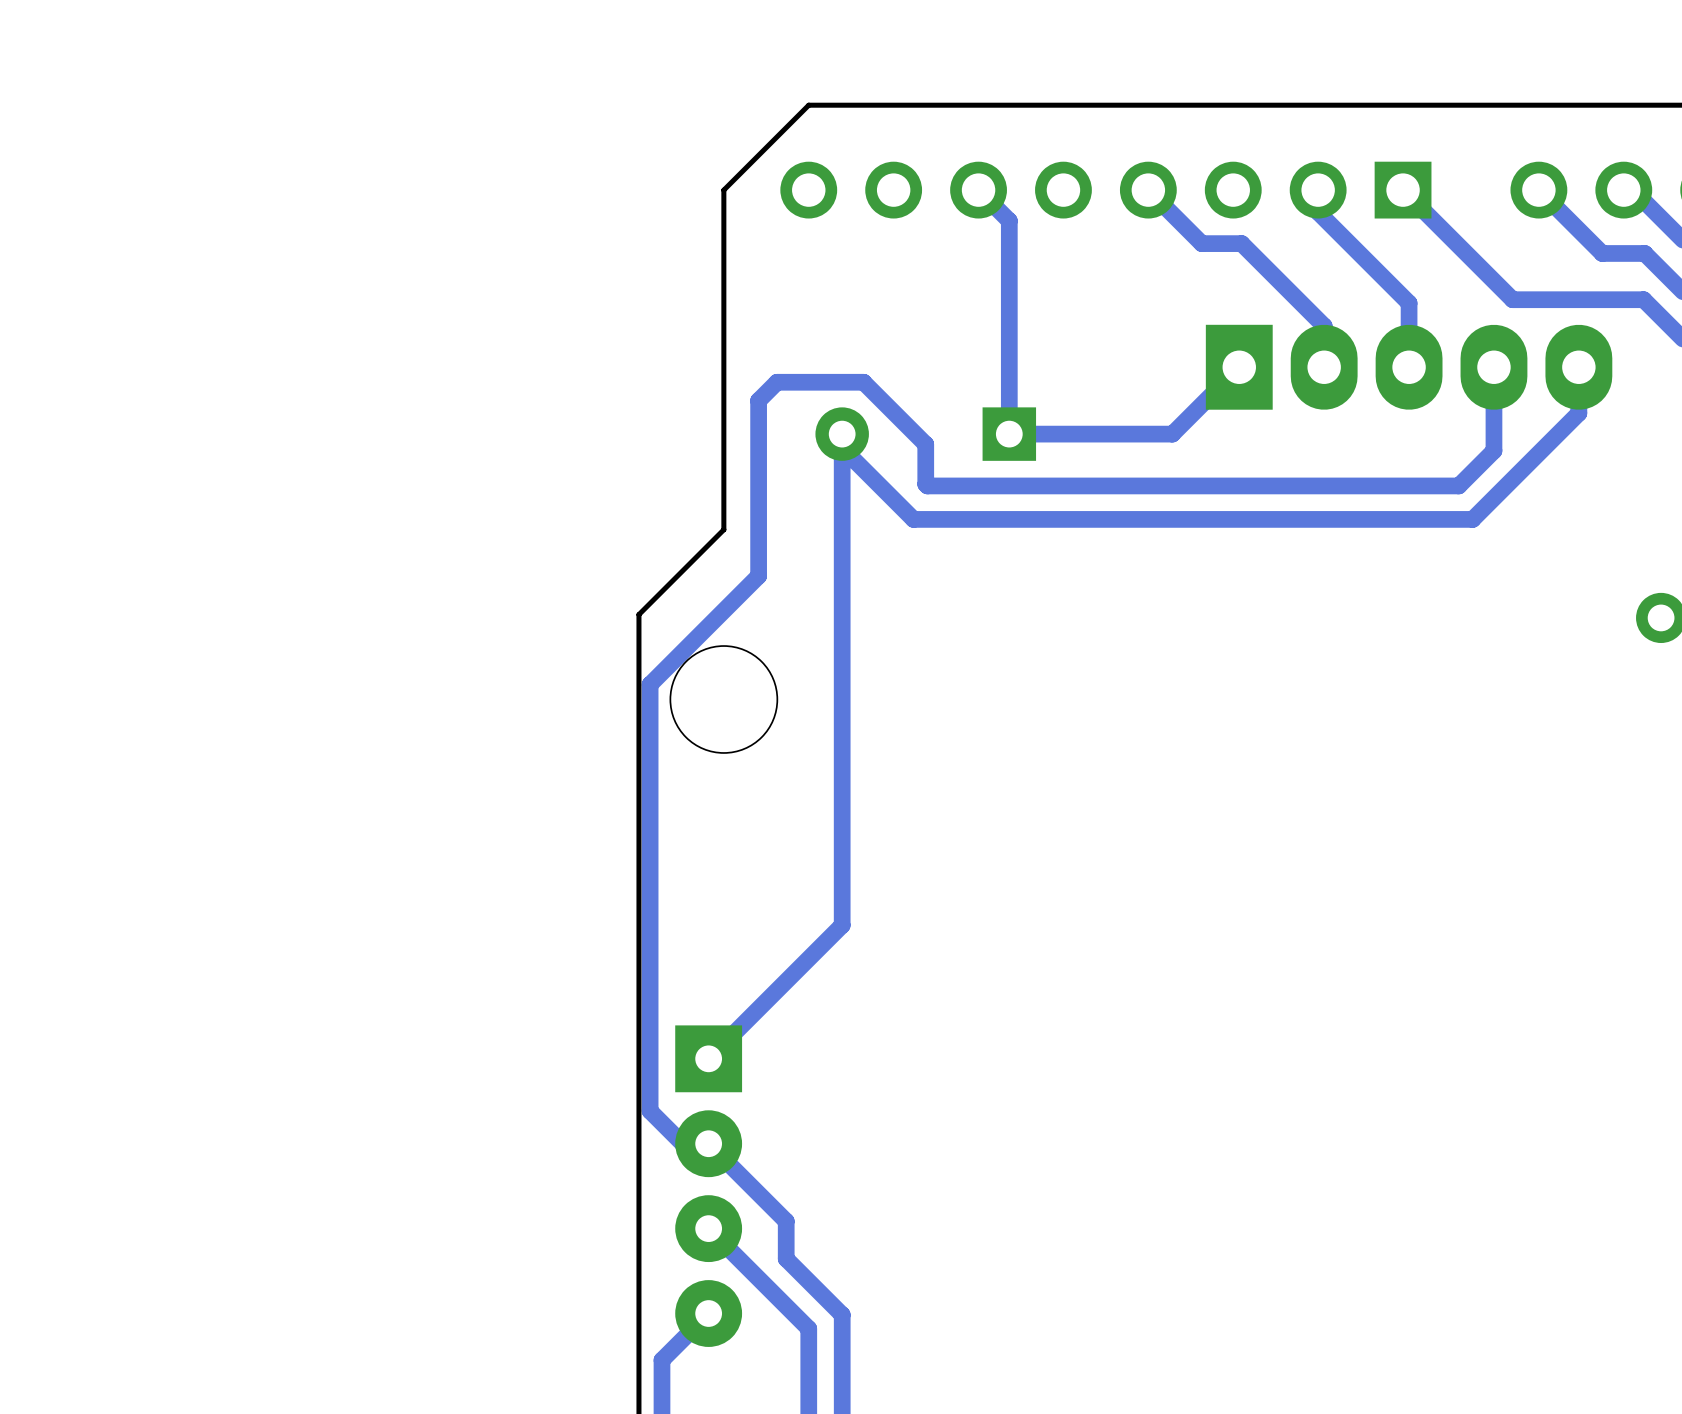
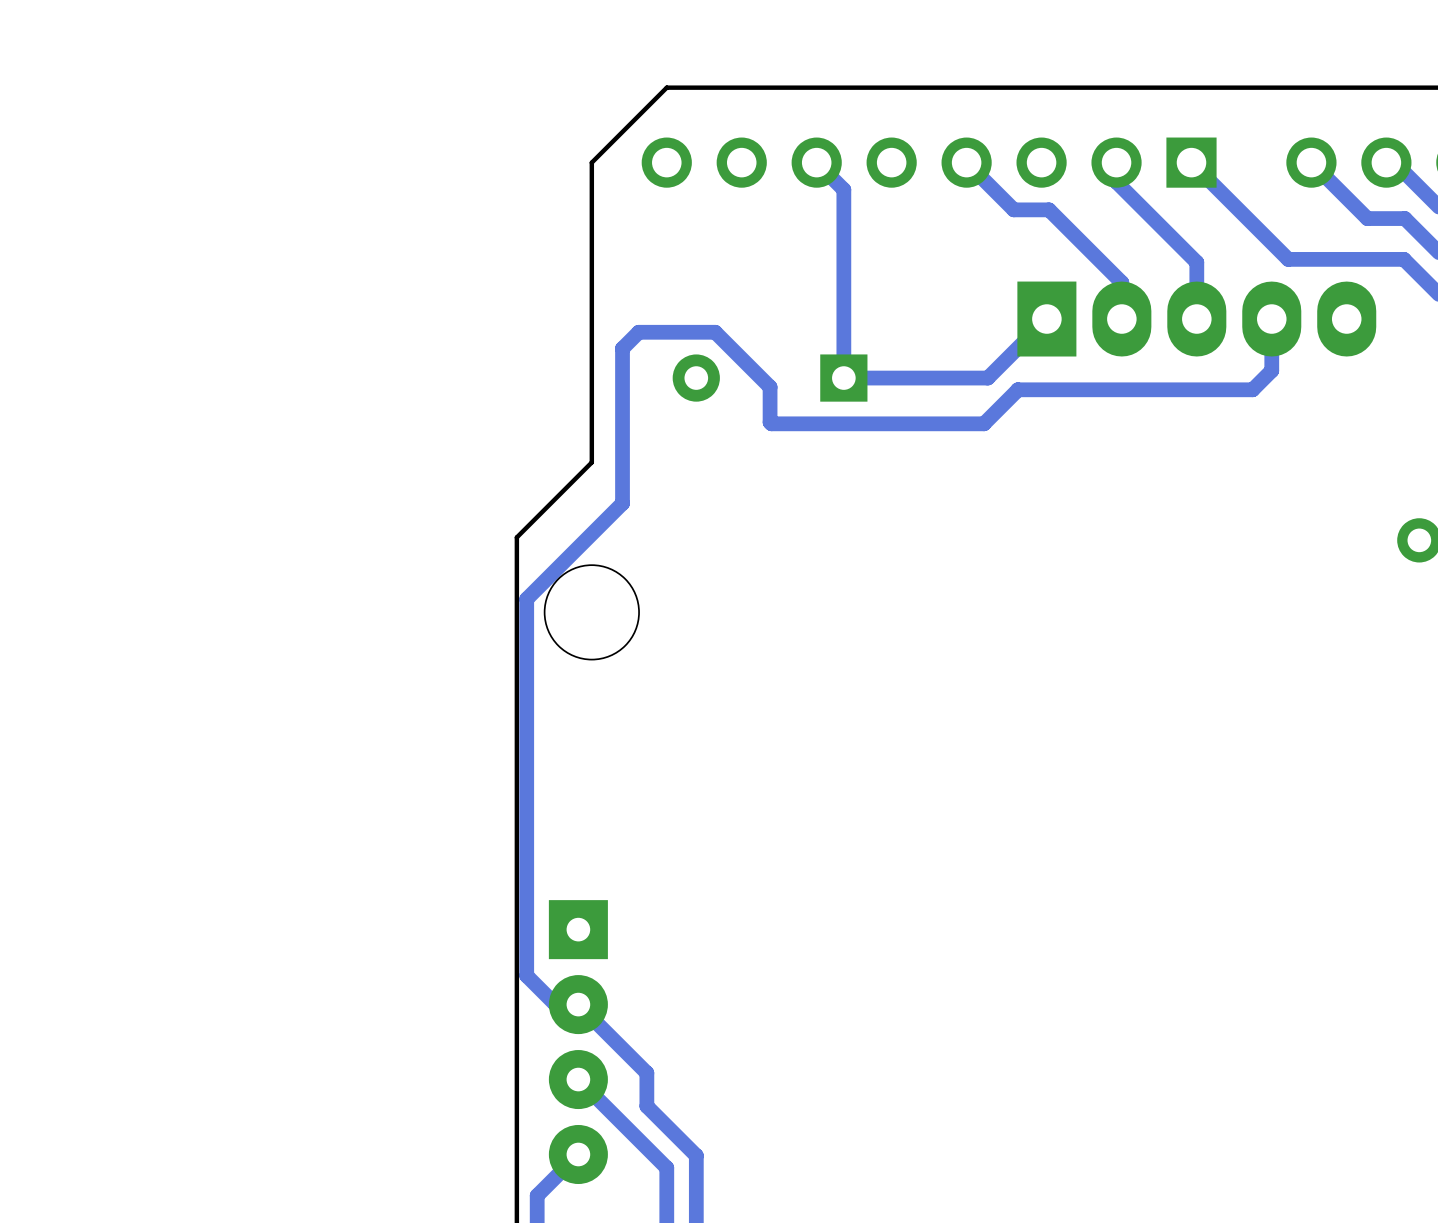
bottom track: (1578, 367) (1578, 413) (1472, 519) (913, 519) (842, 448) (842, 925) (708, 1058) -> none
bottom track: (1493, 425) (1493, 450) (1458, 485) (1168, 485) -> (1271, 370) (1252, 389) (1017, 389) (984, 423)

